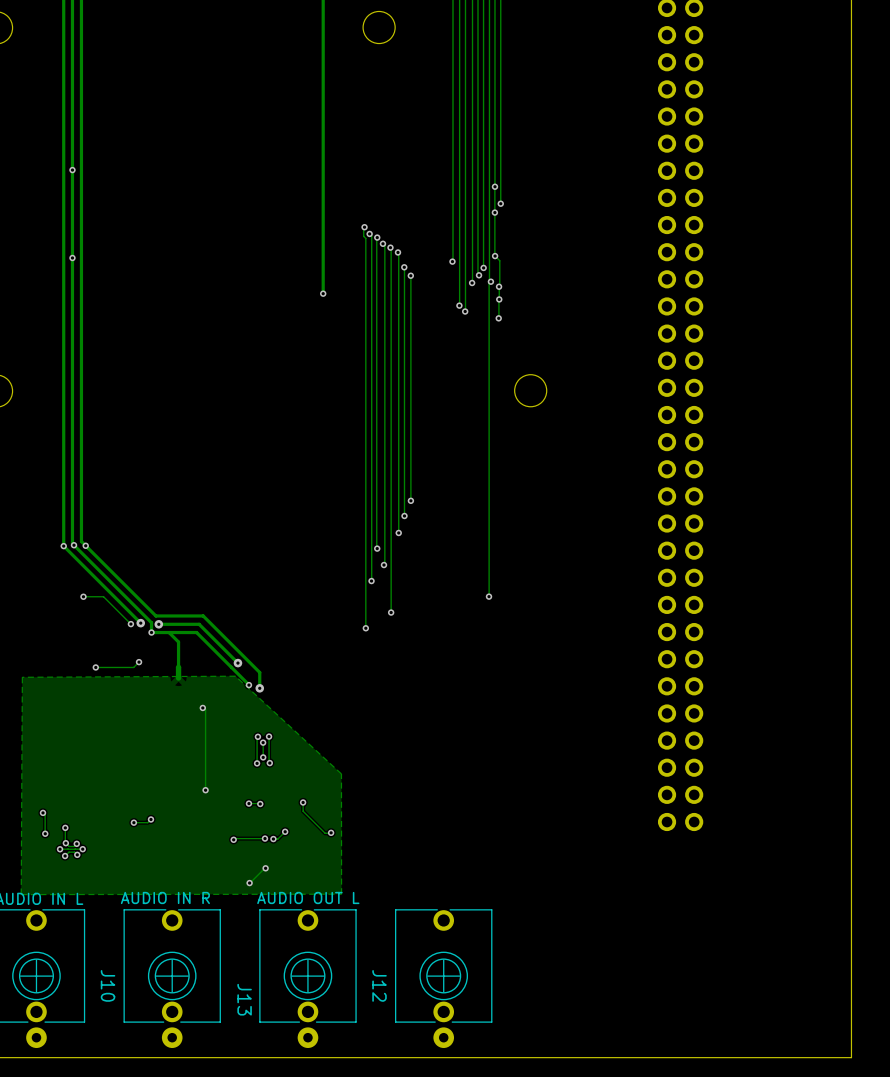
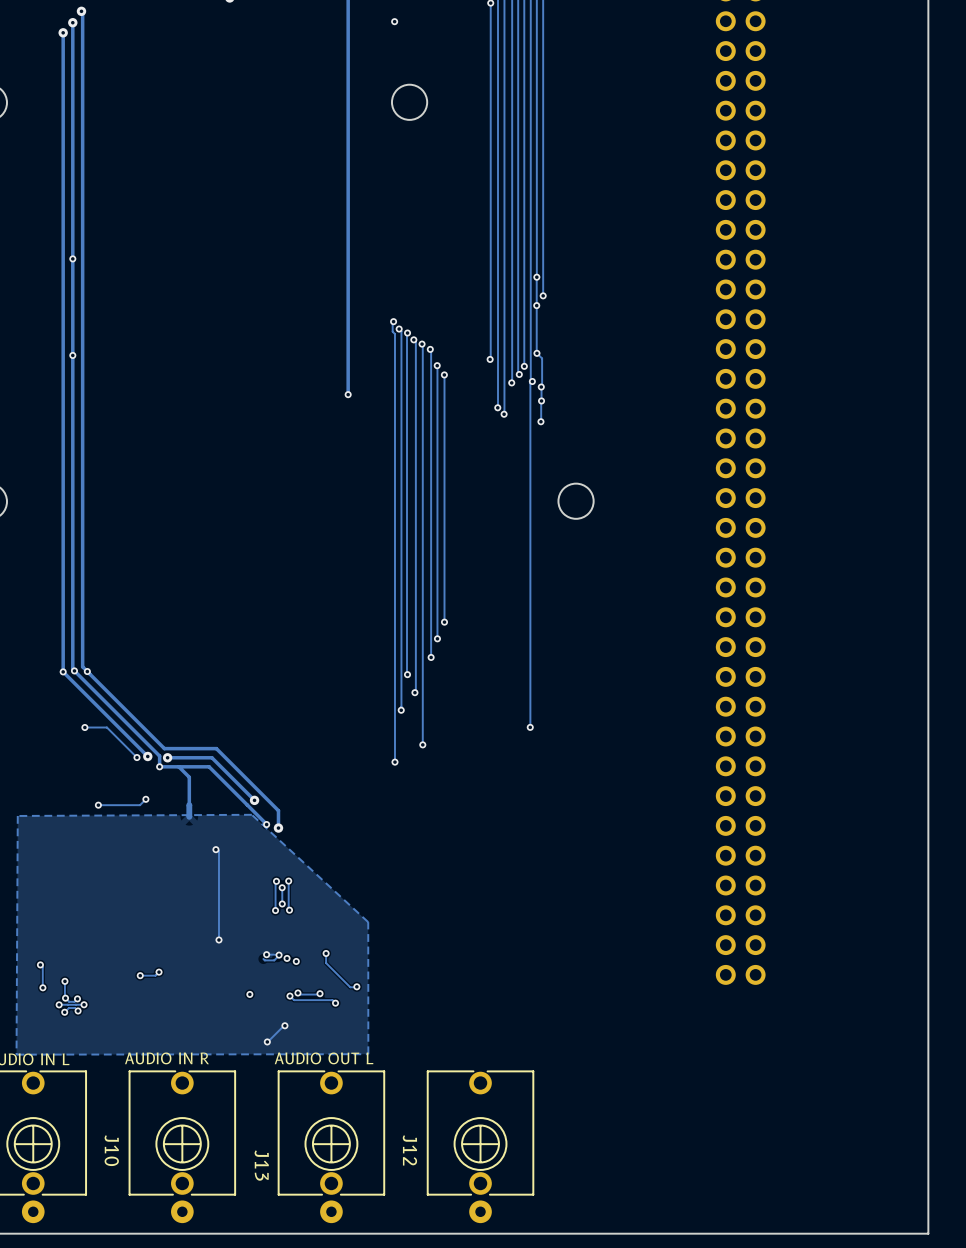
track: none -> (277, 957) (274, 960) (263, 959)
via: none -> (287, 958)
via: none -> (296, 961)
track: (285, 831) (277, 839) (273, 839) -> none
via: (285, 831) -> none
track: none -> (296, 991) (299, 994) (320, 993)
track: (264, 838) (233, 839) -> none
via: (264, 838) -> none
via: none -> (297, 993)
via: (273, 839) -> none
via: none -> (320, 993)
track: none -> (289, 996) (294, 1000) (332, 1000) (335, 1003)
via: none -> (289, 996)
via: none -> (335, 1003)

